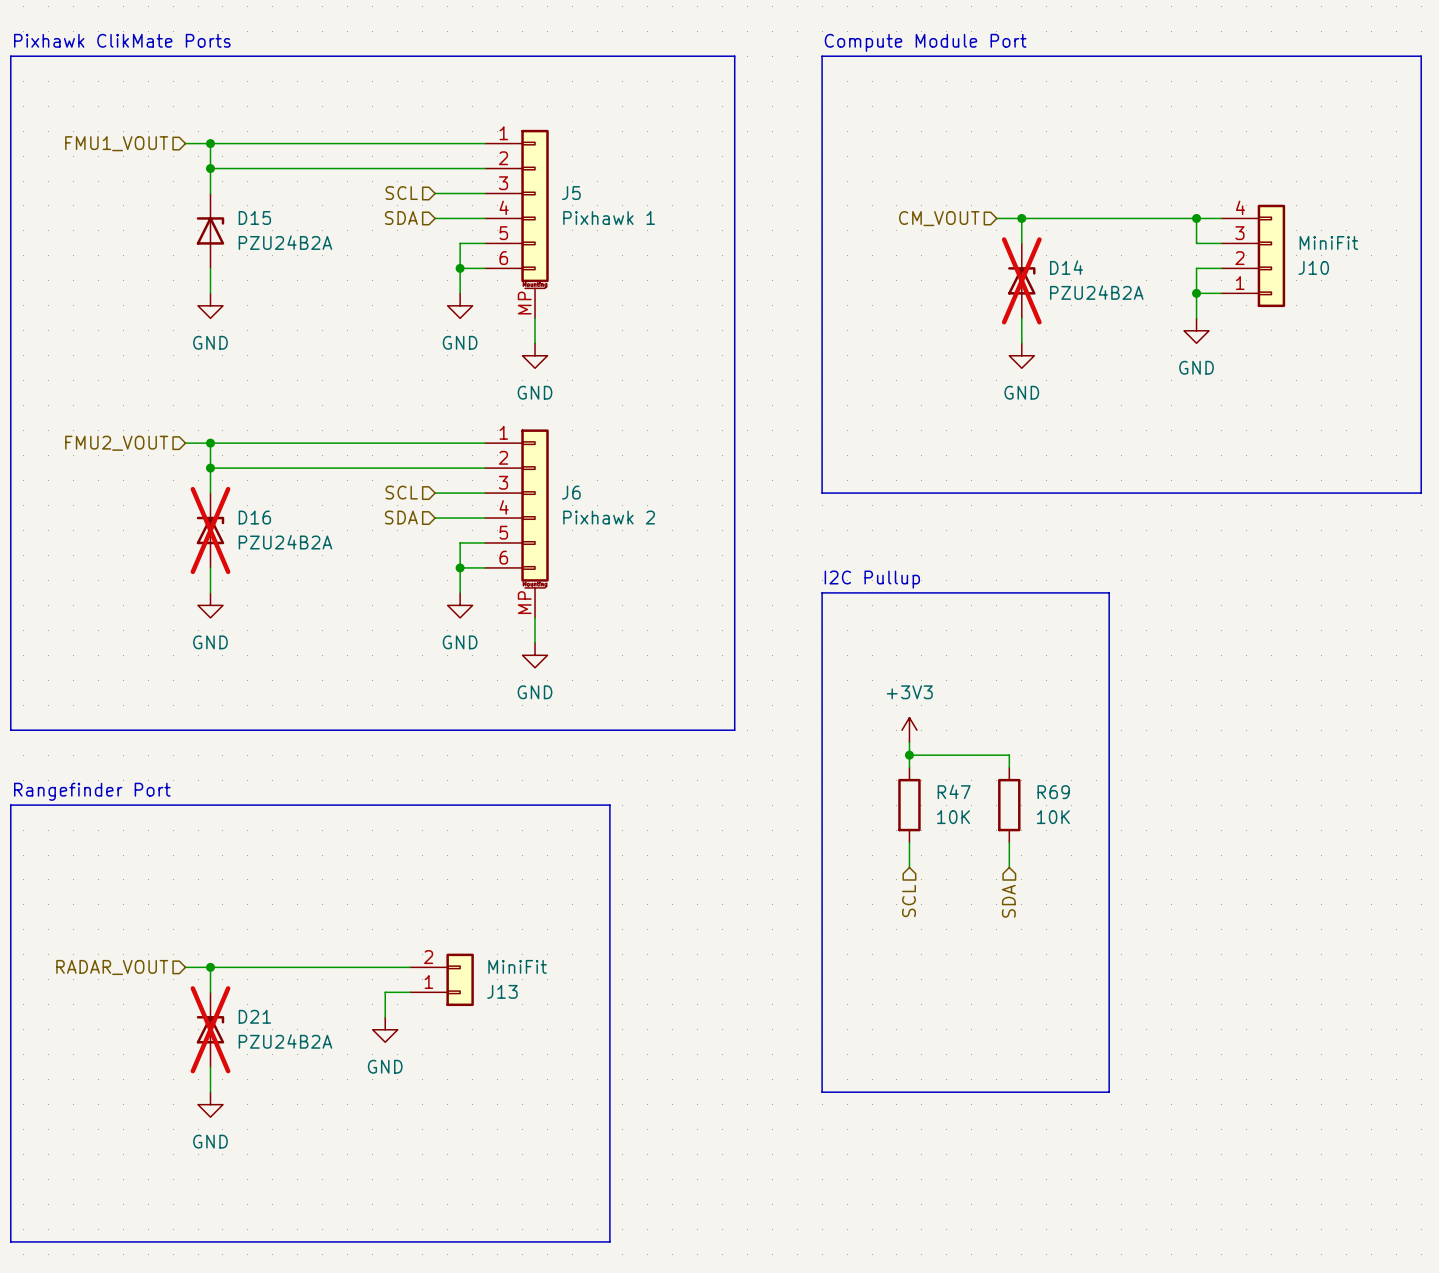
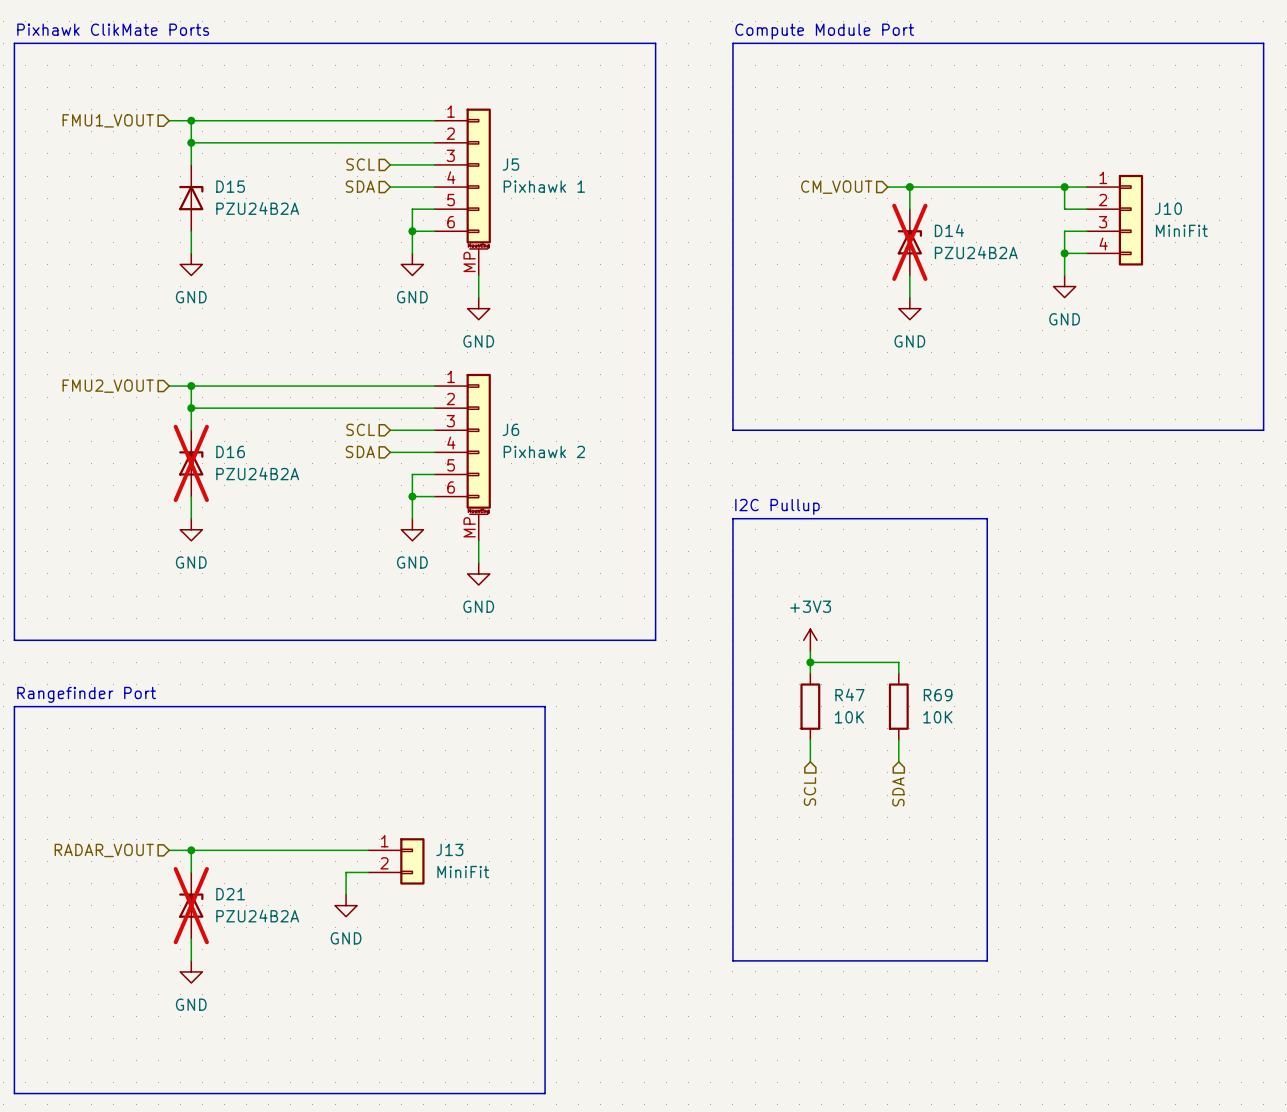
J10 flip: as is (1271, 255) -> up-down (1130, 220)
J13 flip: as is (460, 979) -> up-down (412, 861)

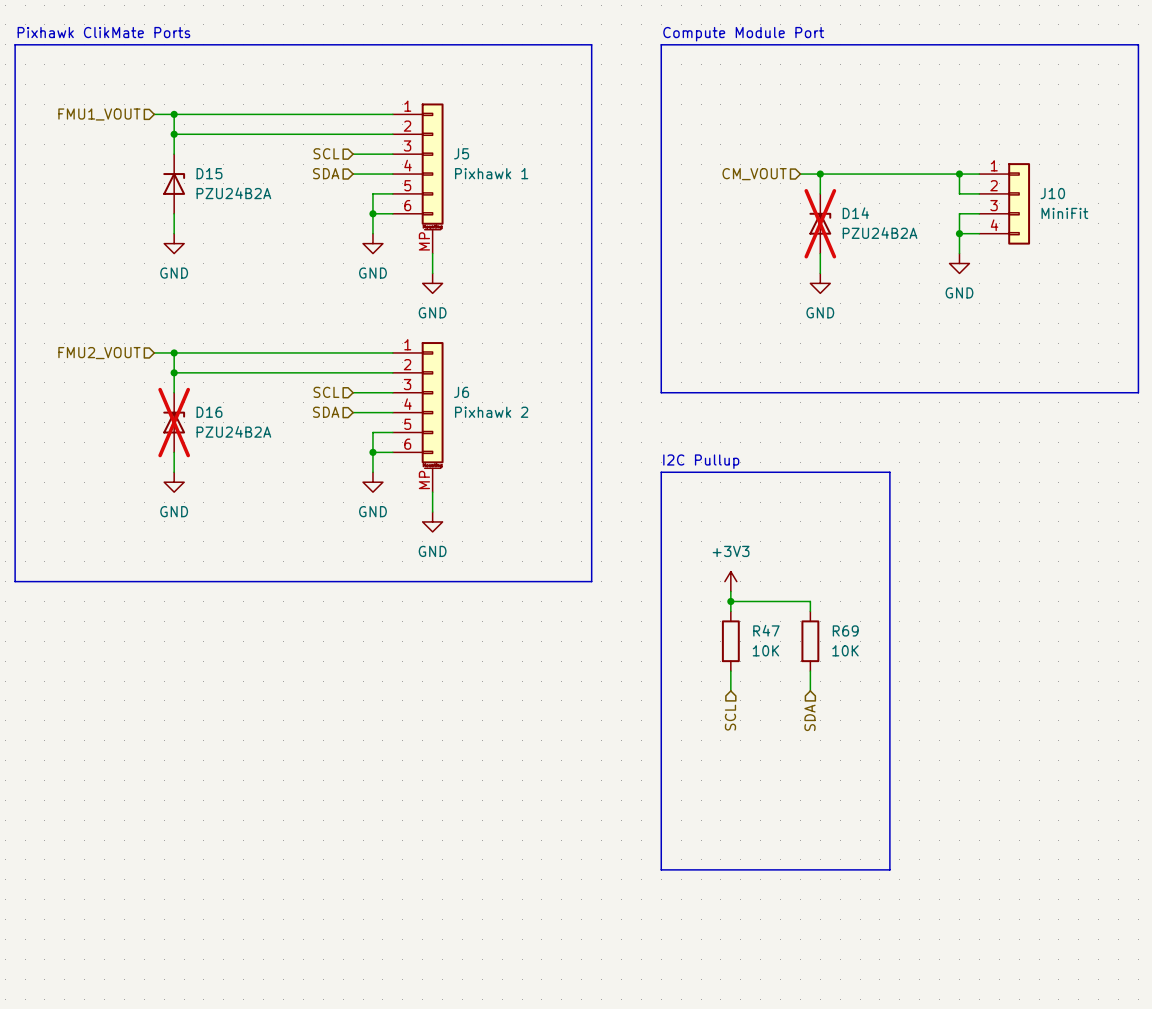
text: Rangefinder Port (86, 694) -> none
line: (14, 706) (545, 706) (545, 1093) (14, 1093) (14, 706) -> none
hierarchical label: RADAR_VOUT (104, 850) -> none
wire: (169, 850) (368, 850) -> none
wire: (191, 850) (191, 872) -> none
junction: (191, 850) -> none
J13: MiniFit (396, 861) -> none
wire: (368, 872) (346, 872) (346, 894) -> none
D21: PZU24B2A (191, 905) -> none
power symbol: GND (346, 905) -> none
wire: (191, 938) (191, 960) -> none
power symbol: GND (191, 971) -> none

